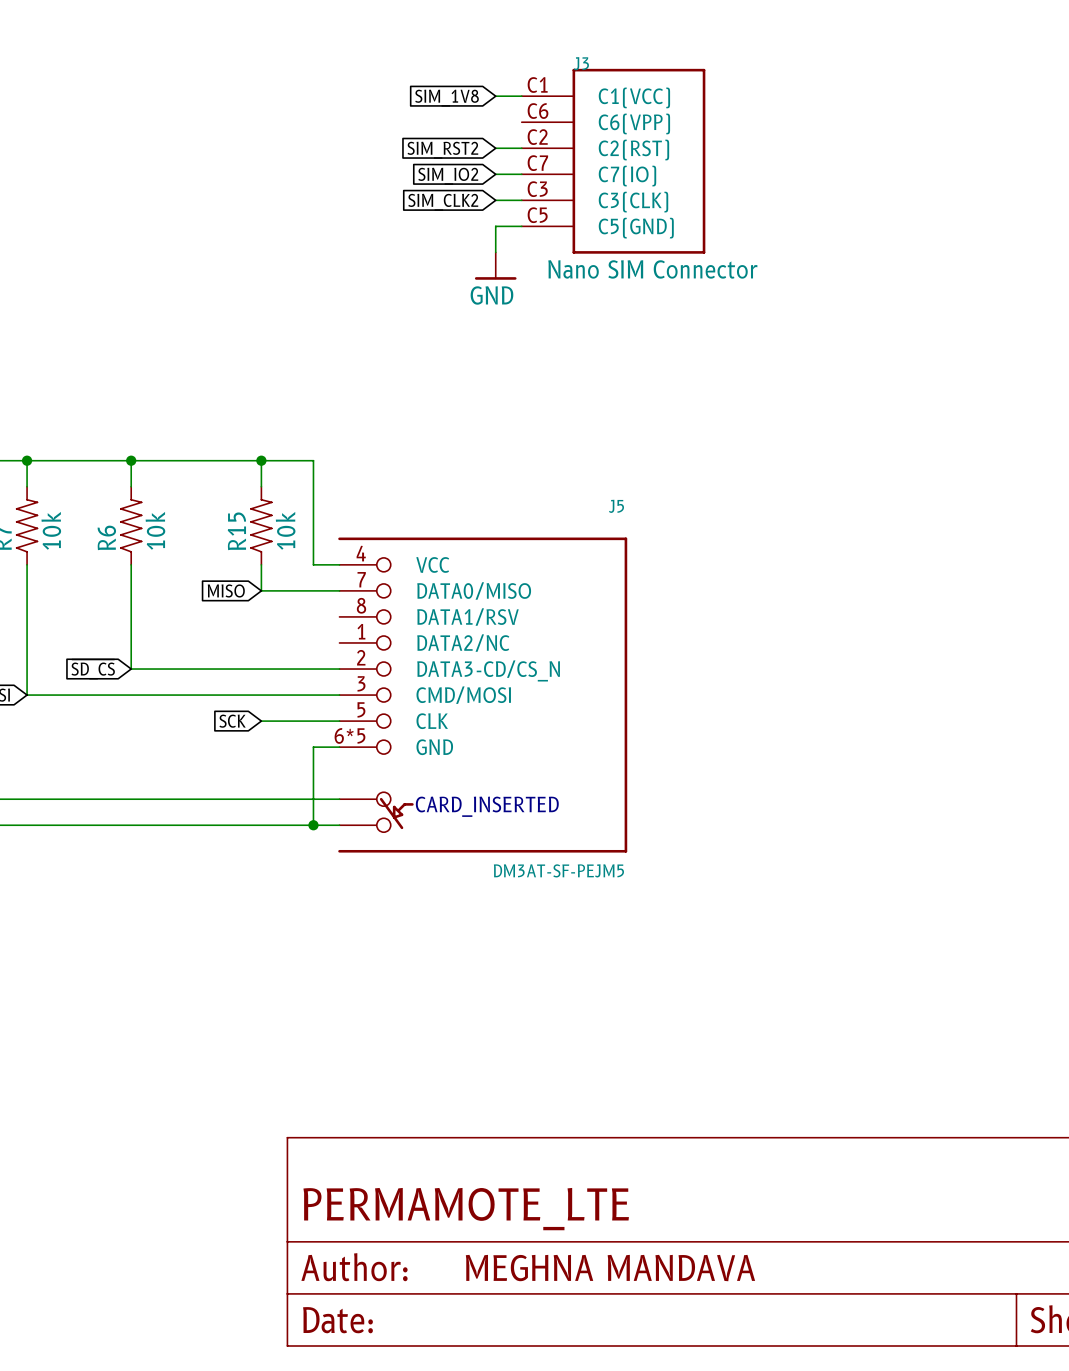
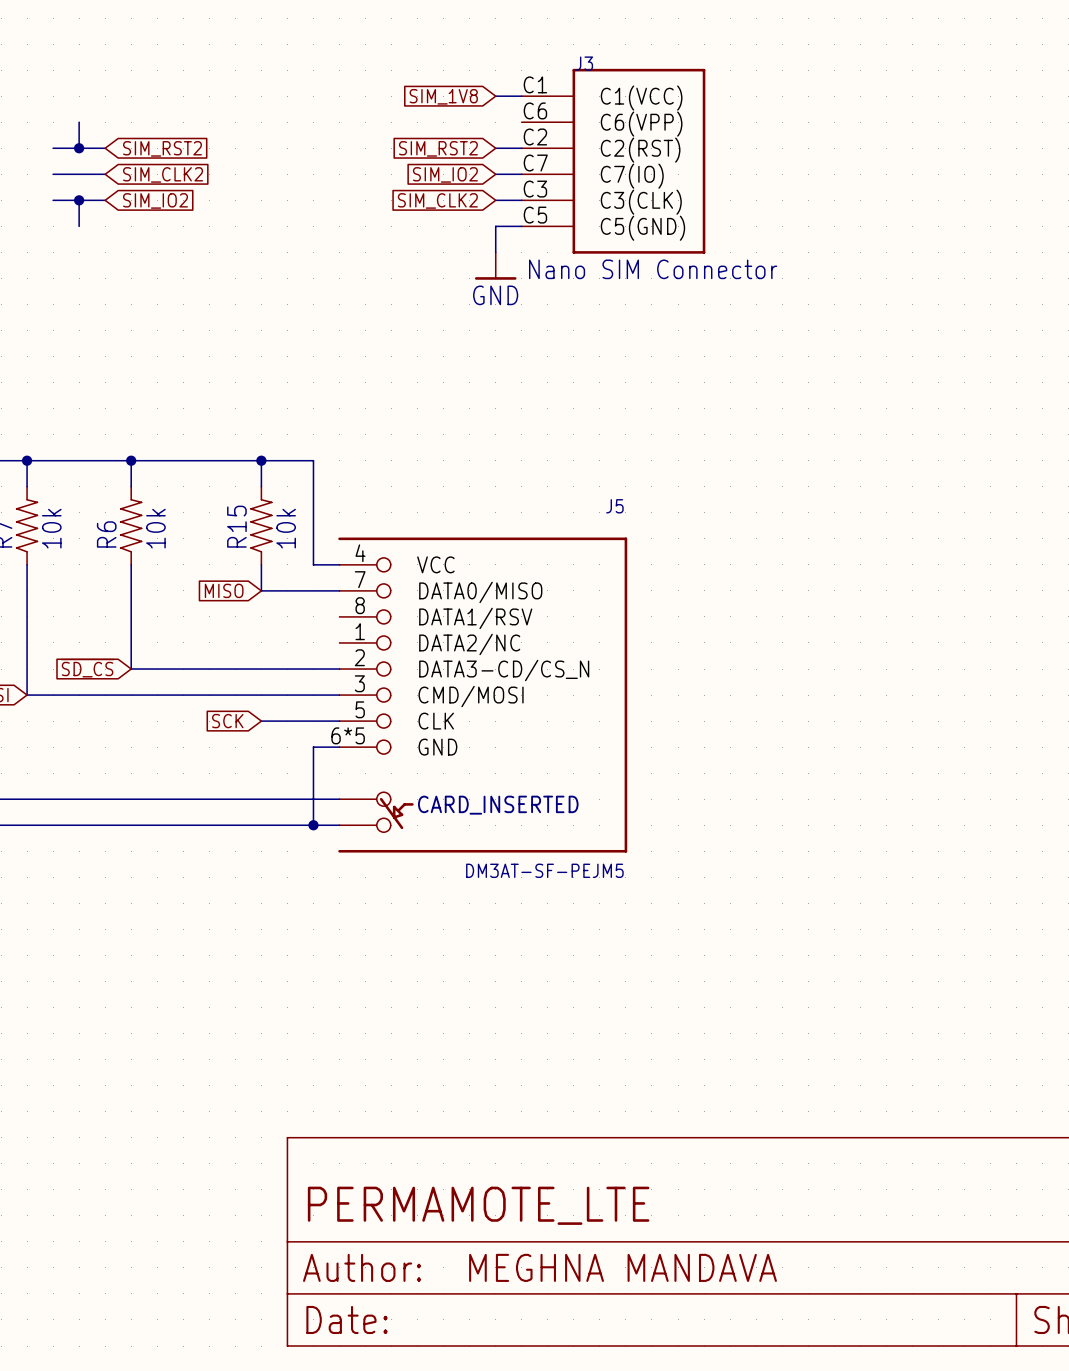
wire: none -> (79, 122) (79, 148)
wire: none -> (53, 148) (105, 148)
junction: none -> (79, 148)
global label: none -> SIM_RST2 (162, 148)
wire: none -> (53, 174) (105, 174)
global label: none -> SIM_CLK2 (163, 174)
wire: none -> (53, 200) (105, 200)
wire: none -> (79, 200) (79, 226)
junction: none -> (79, 200)
global label: none -> SIM_IO2 (155, 200)

